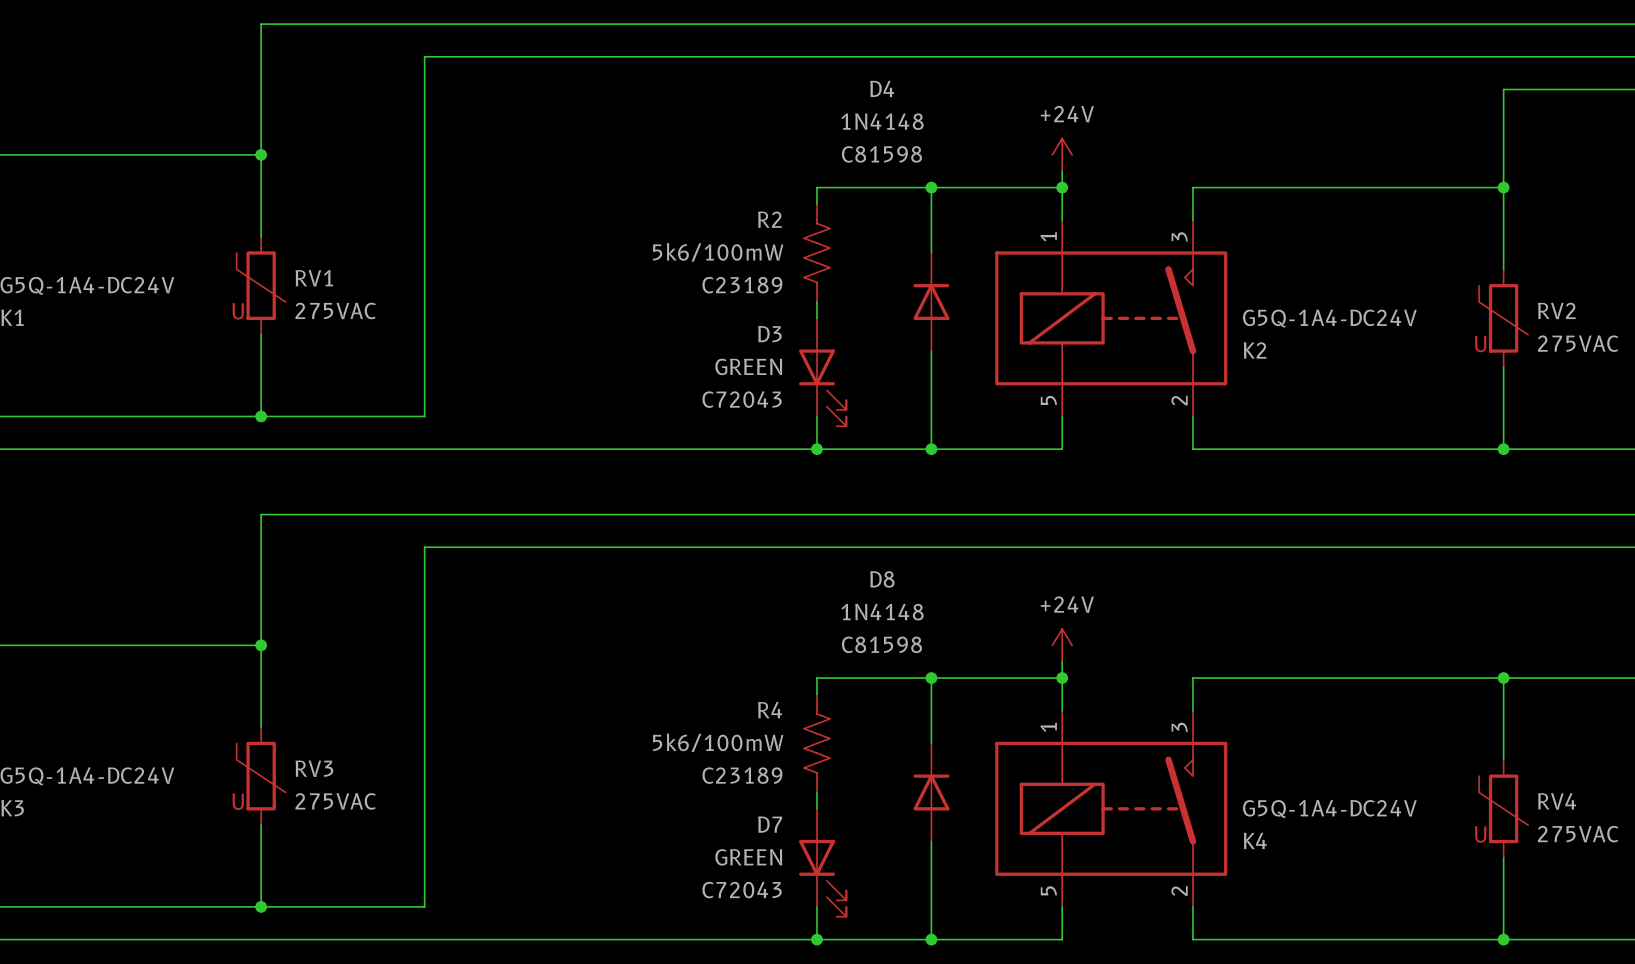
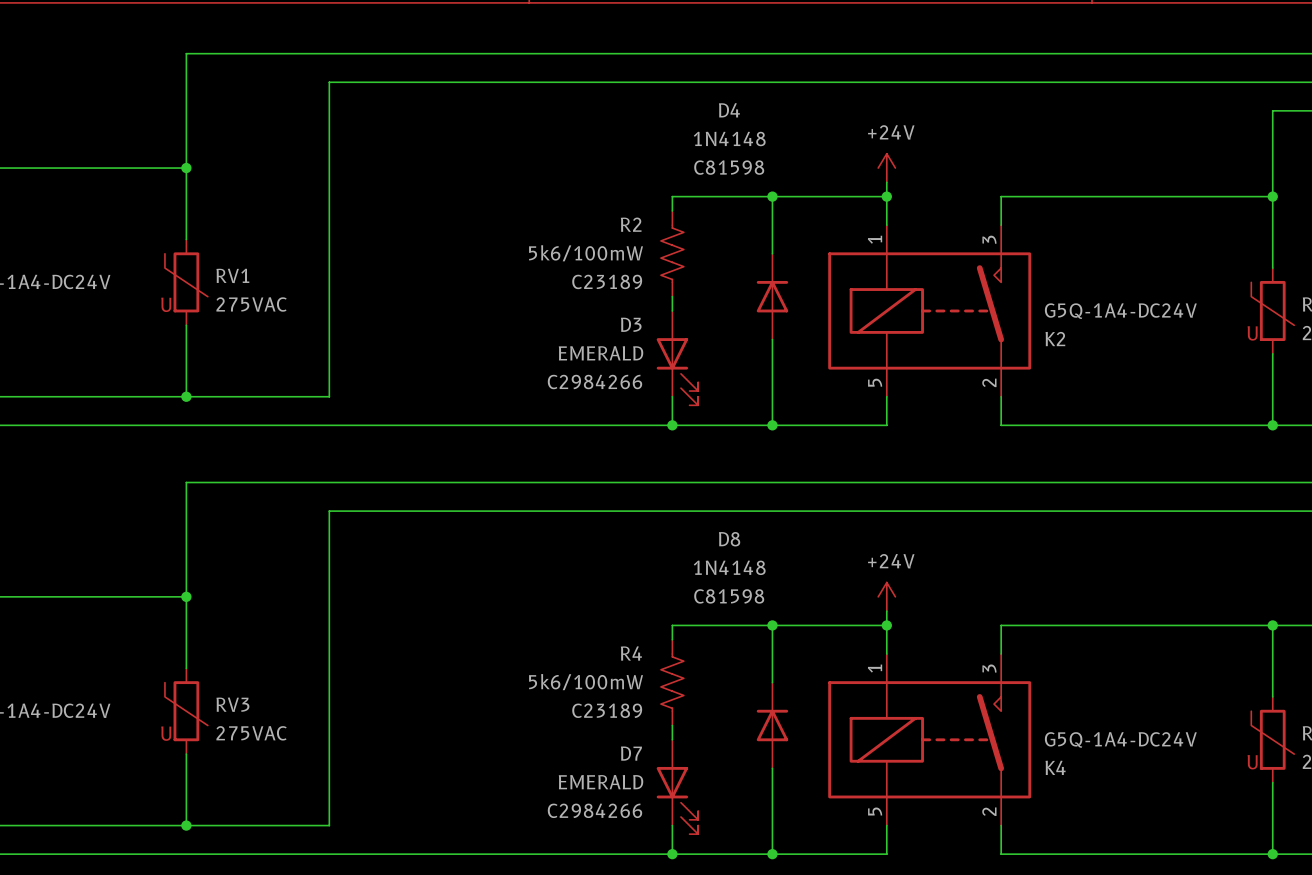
D3 value: GREEN (748, 366) -> EMERALD (601, 353)
D3 text: C72043 (742, 399) -> C2984266 (594, 381)
D7 value: GREEN (748, 857) -> EMERALD (601, 782)
D7 text: C72043 (742, 890) -> C2984266 (594, 810)

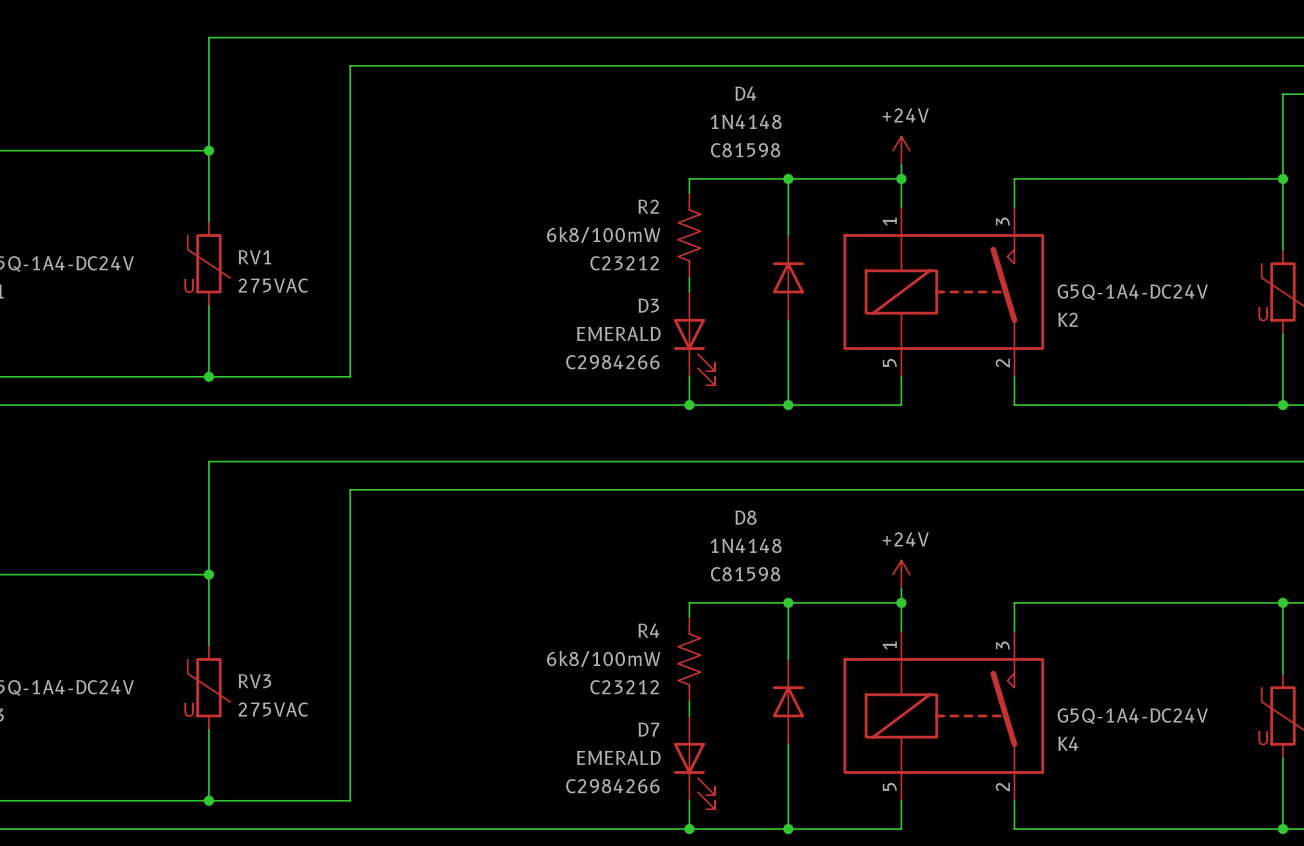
R2 value: 5k6/100mW (586, 253) -> 6k8/100mW (603, 234)
R2 text: C23189 (607, 281) -> C23212 (624, 263)
R4 value: 5k6/100mW (586, 682) -> 6k8/100mW (603, 658)
R4 text: C23189 (607, 710) -> C23212 (624, 687)

